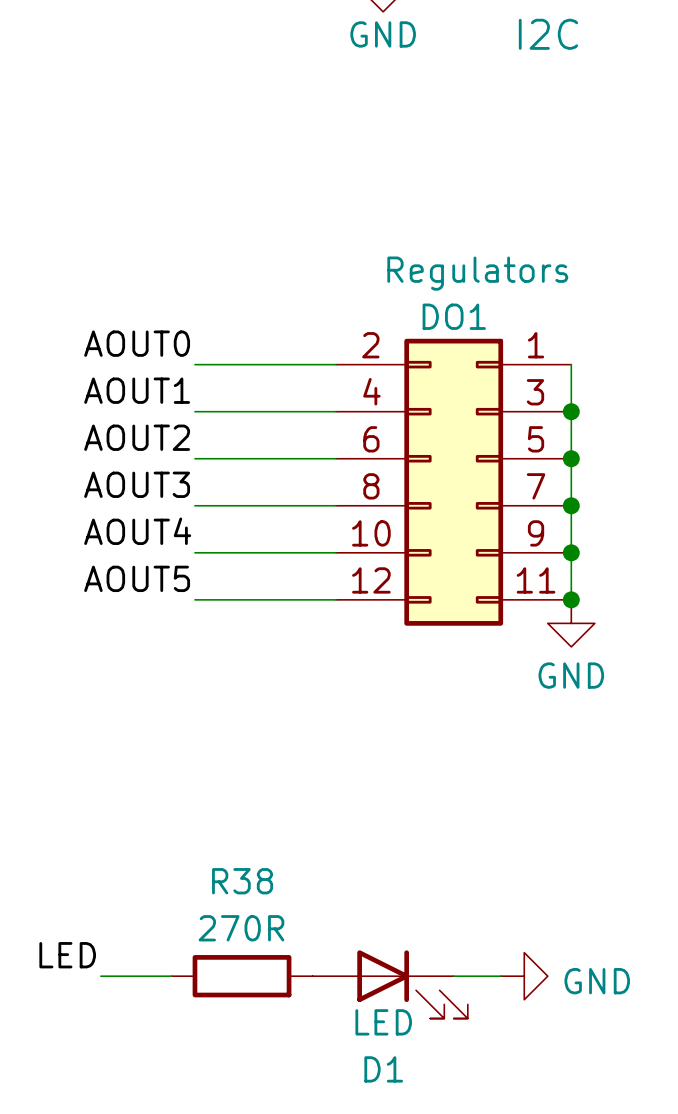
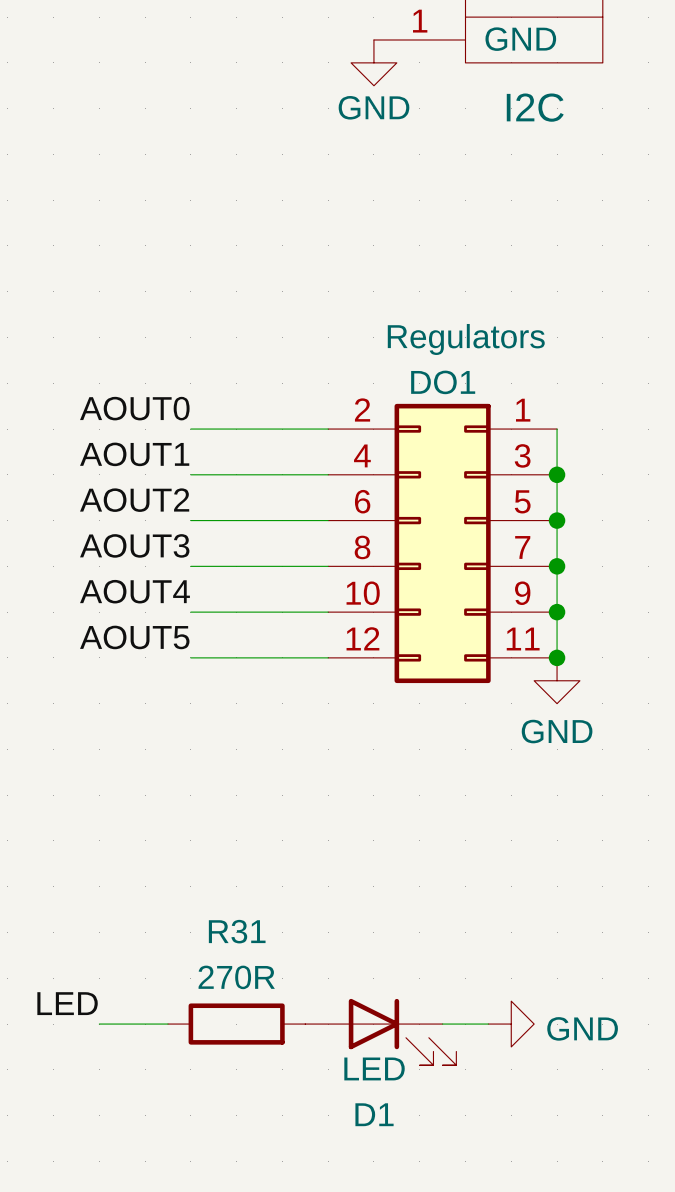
R38 name: R38 (242, 881) -> R31 (237, 931)

